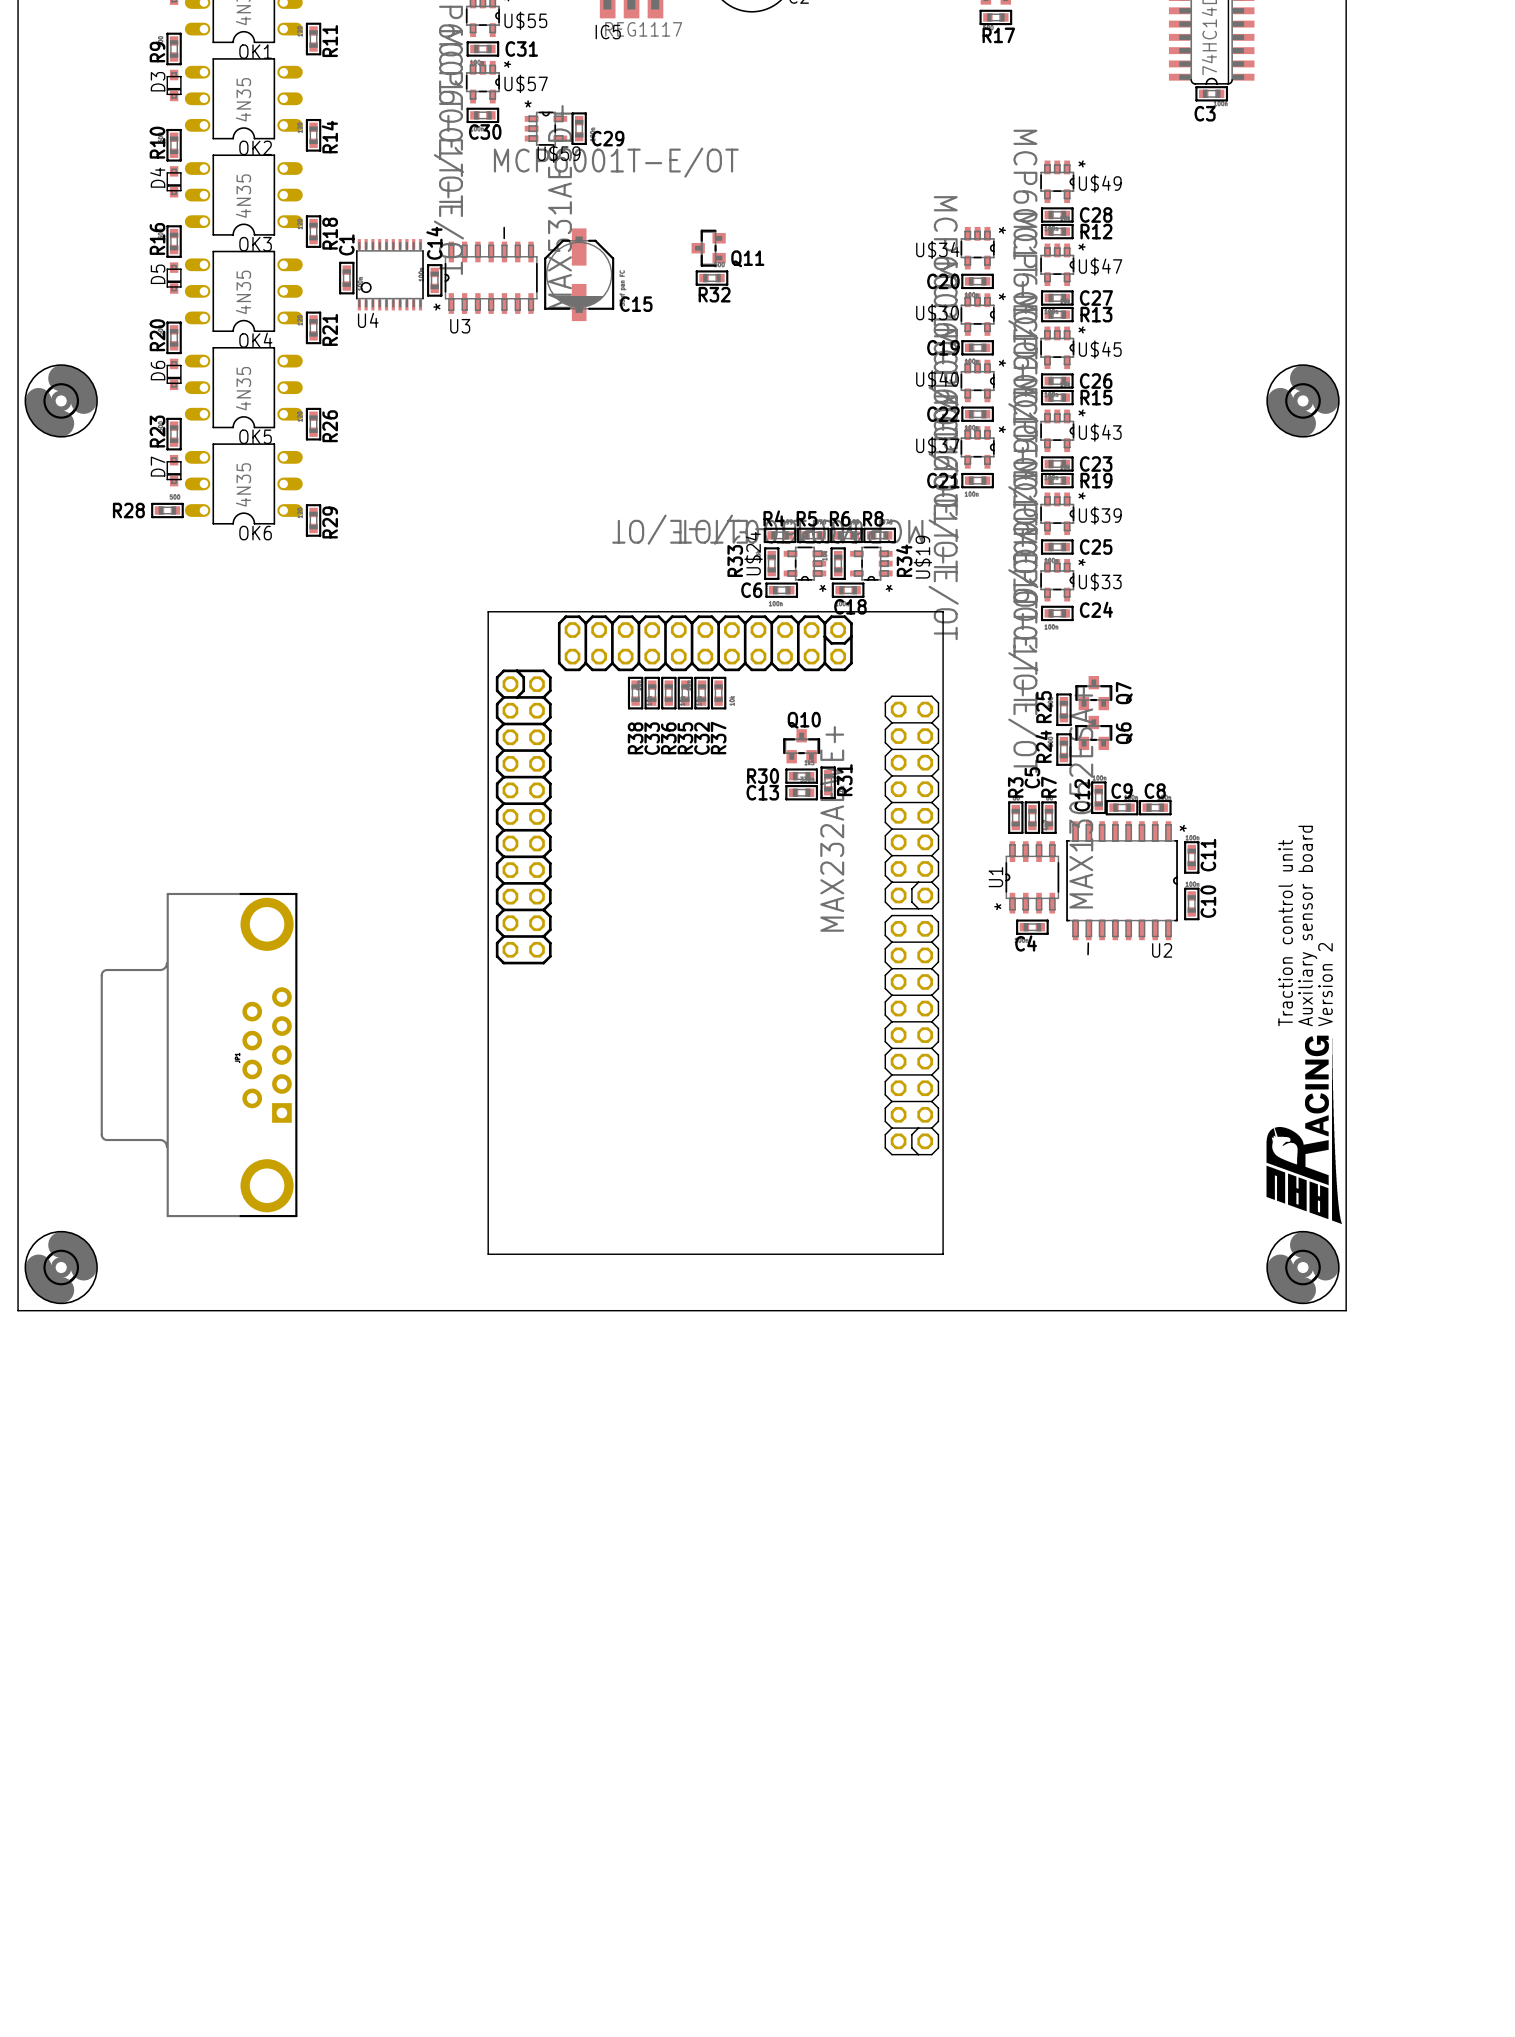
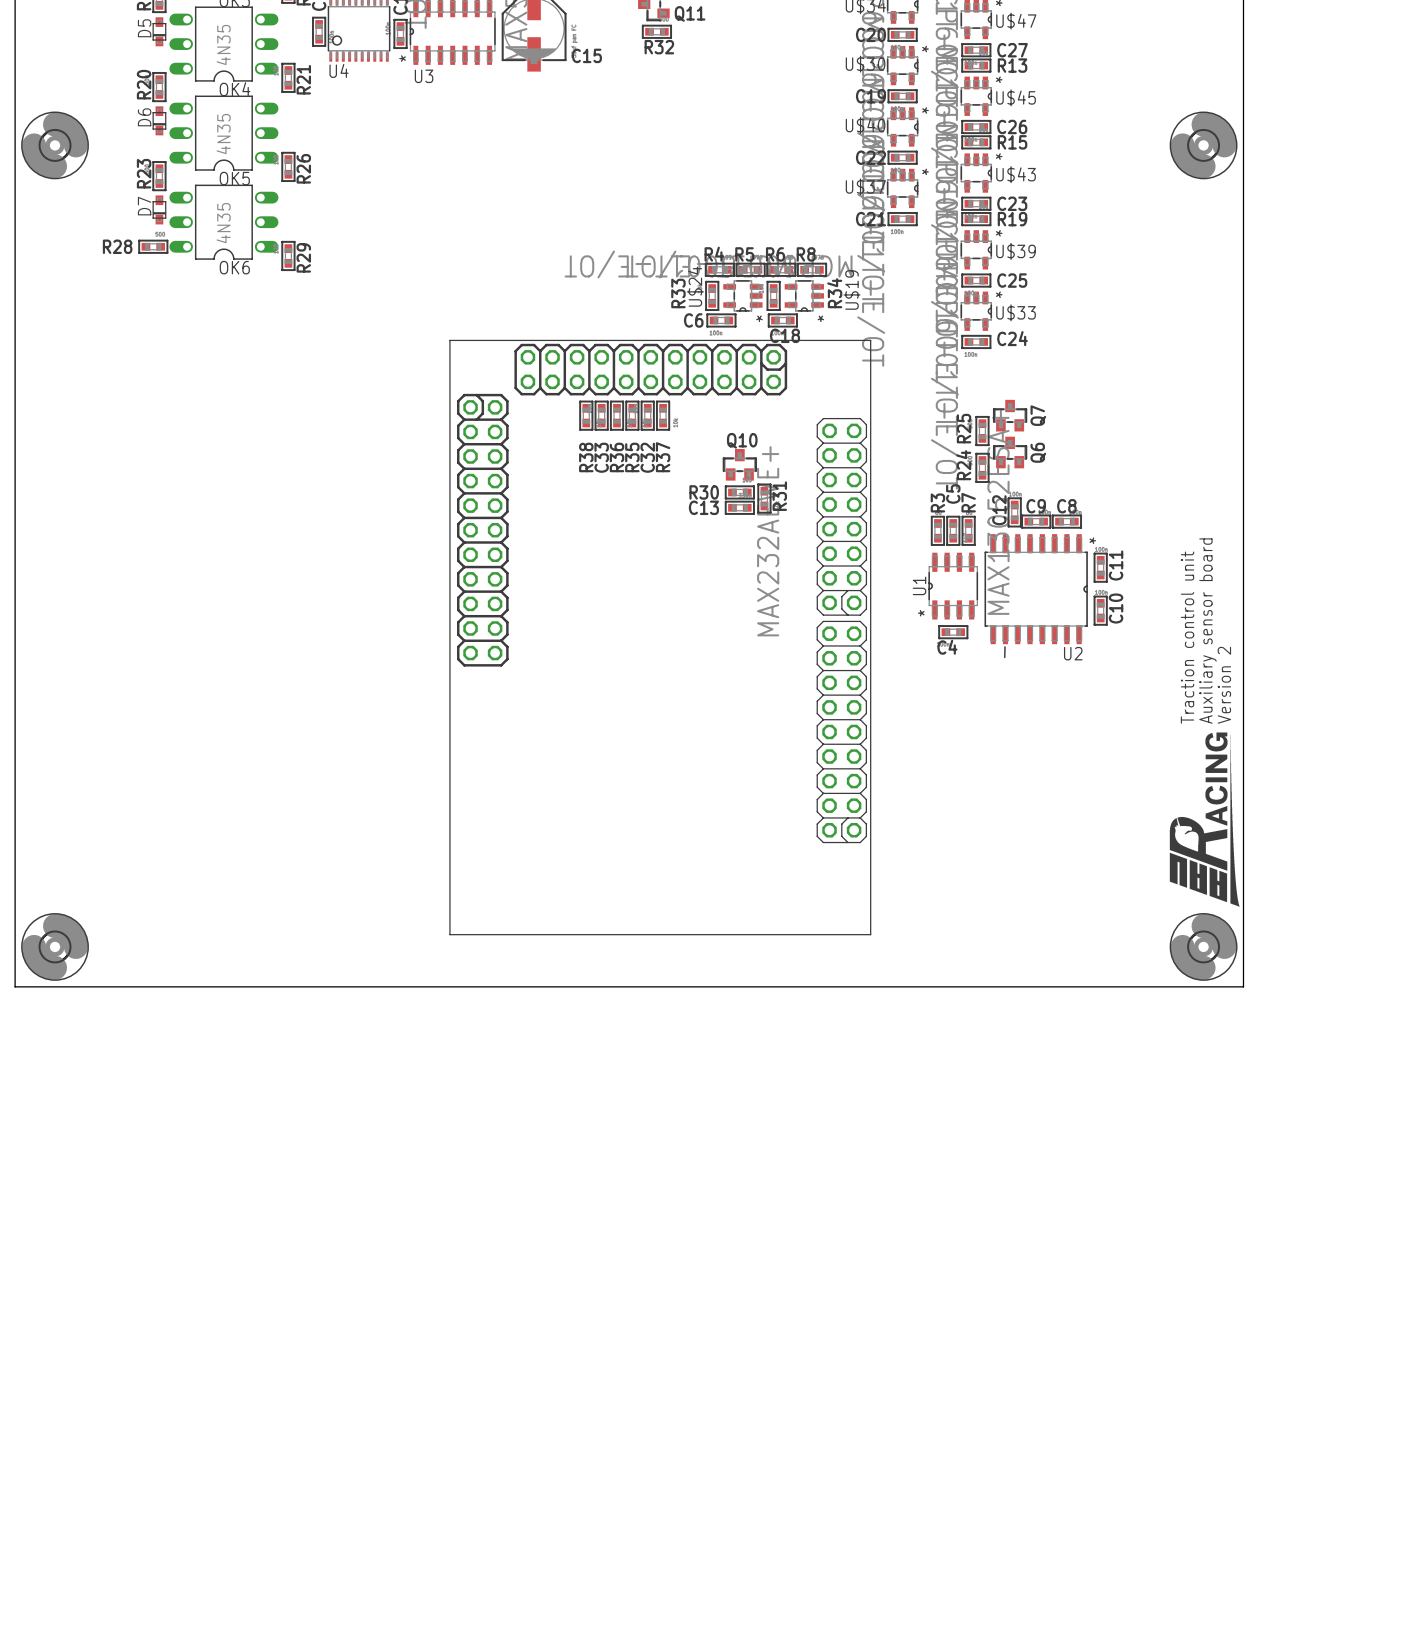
part: (199, 1055) -> none

